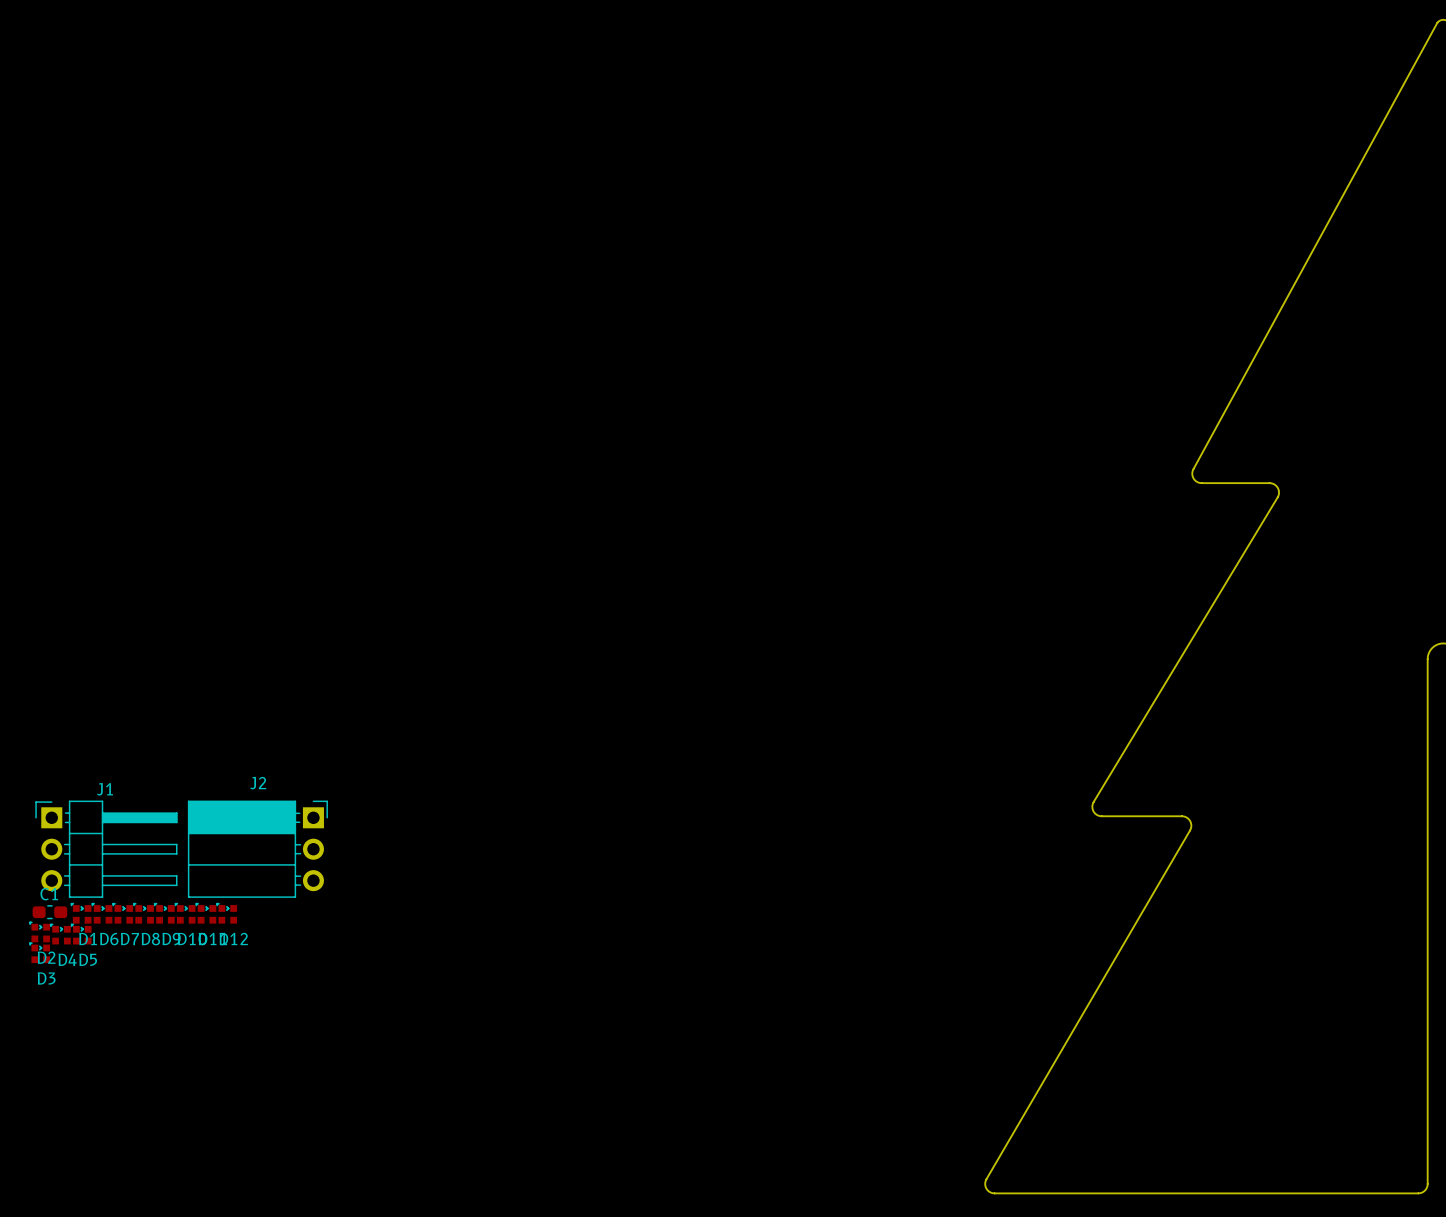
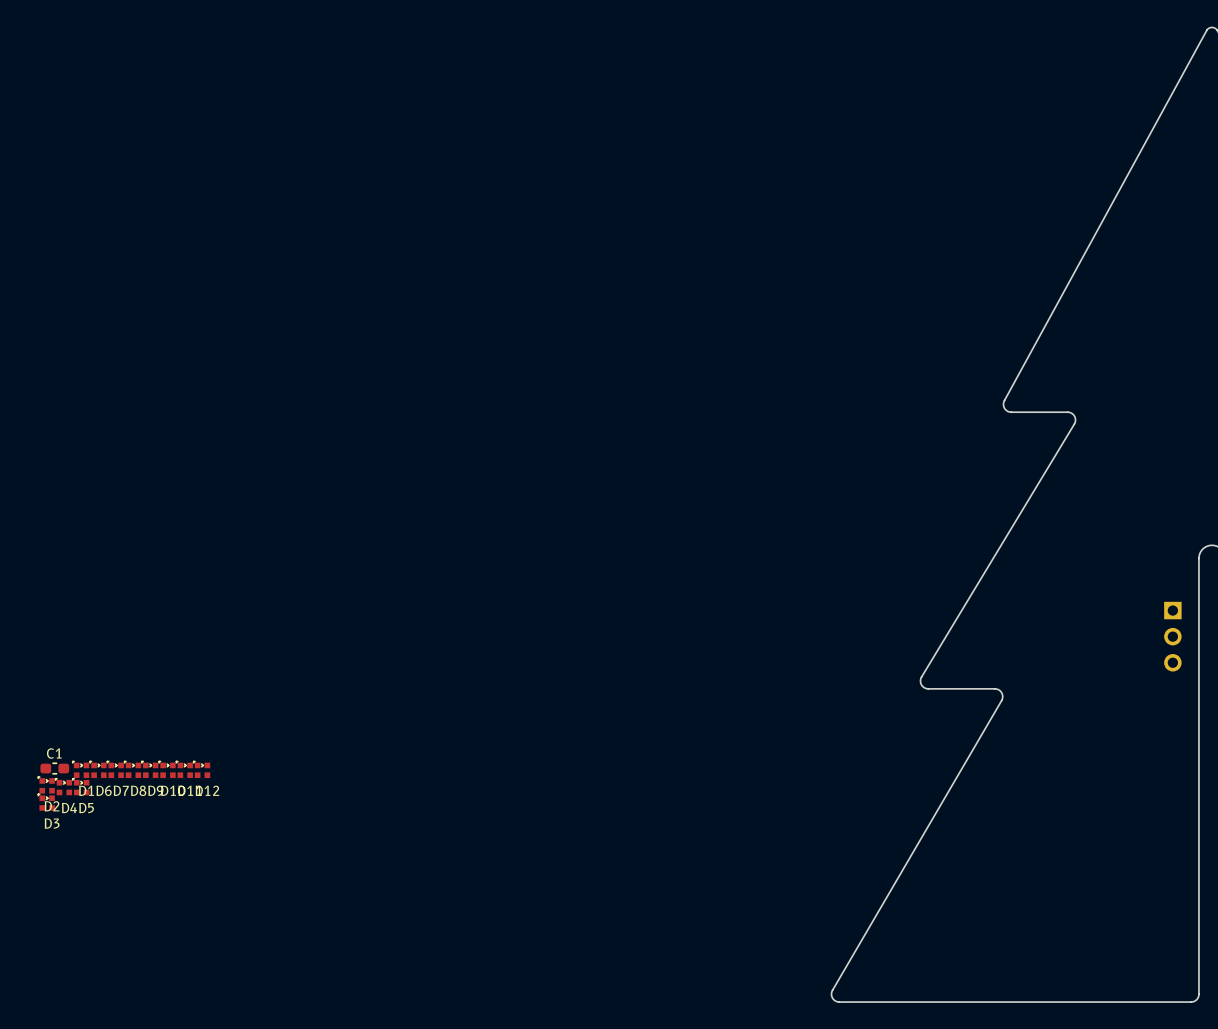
part: none -> (1172, 636)
J1: (106, 849) -> none
J2: (257, 849) -> none

